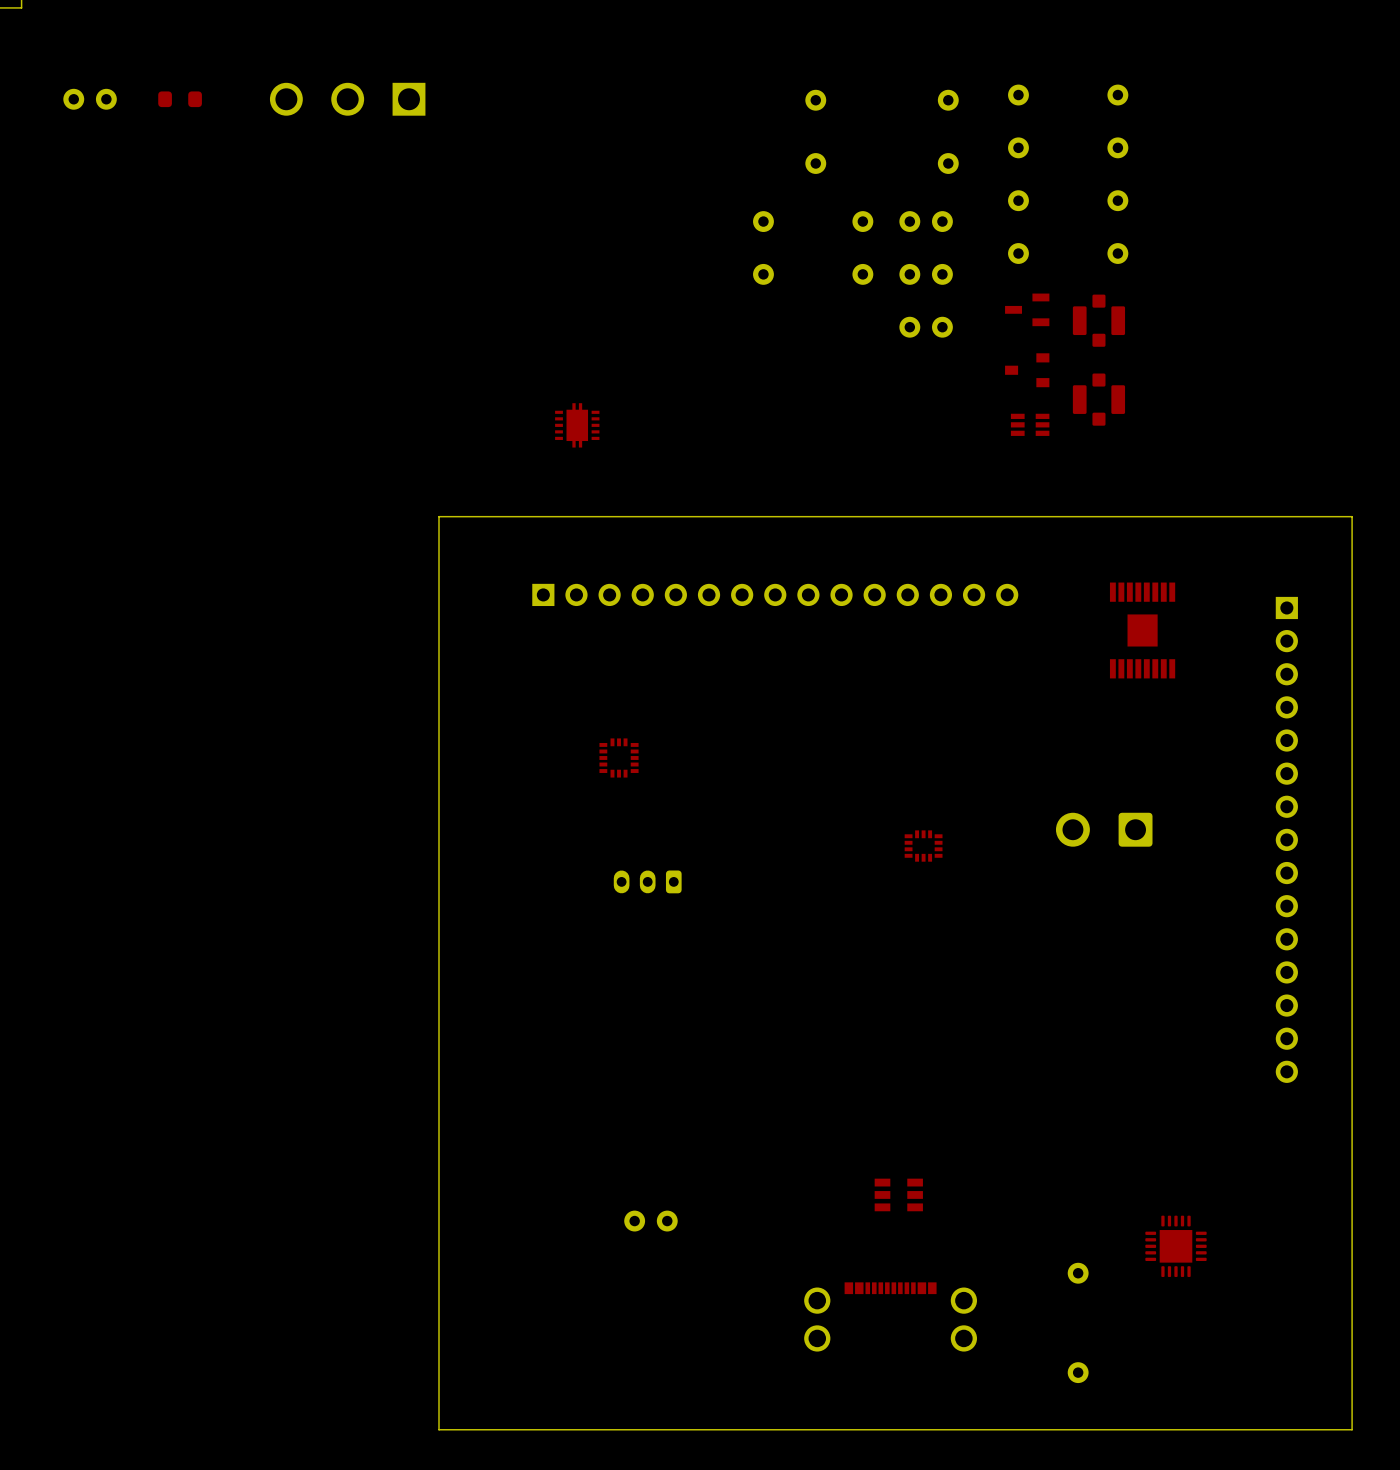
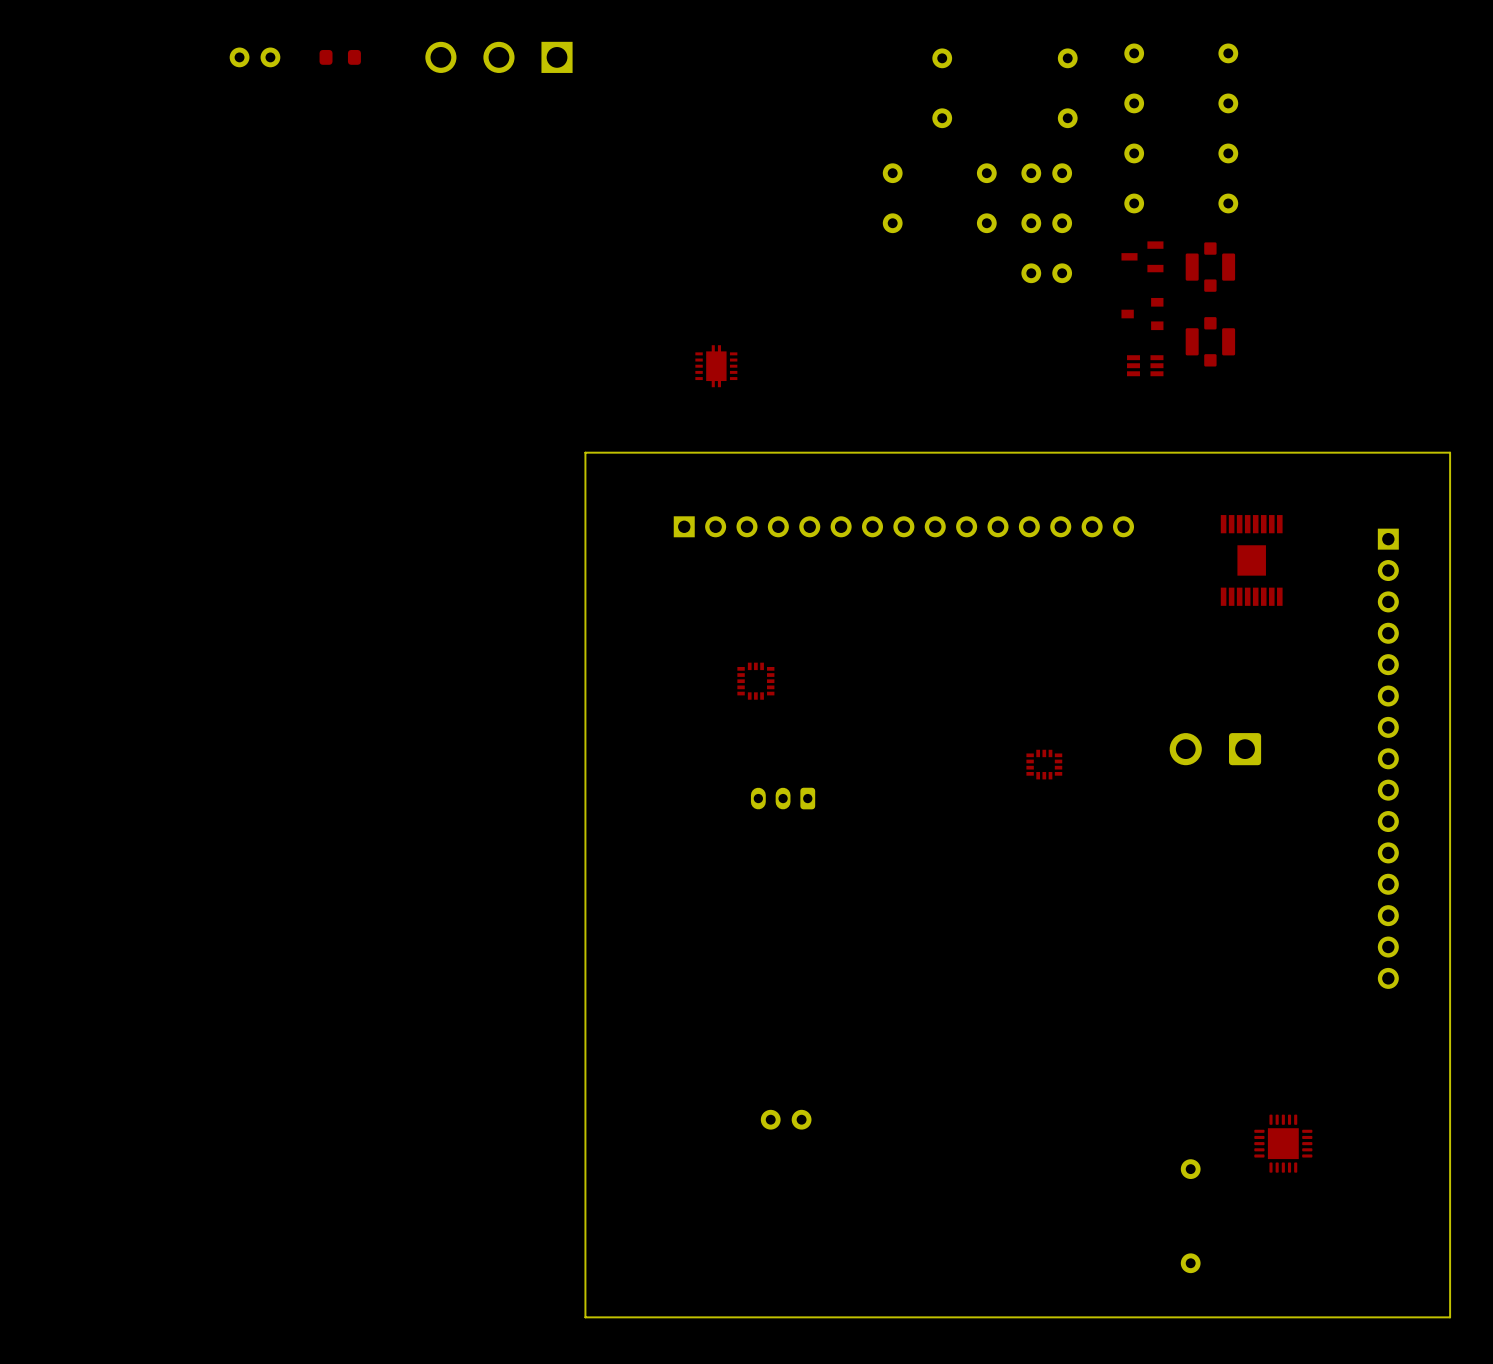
part: (898, 1194) -> none
part: (890, 1316) -> none

